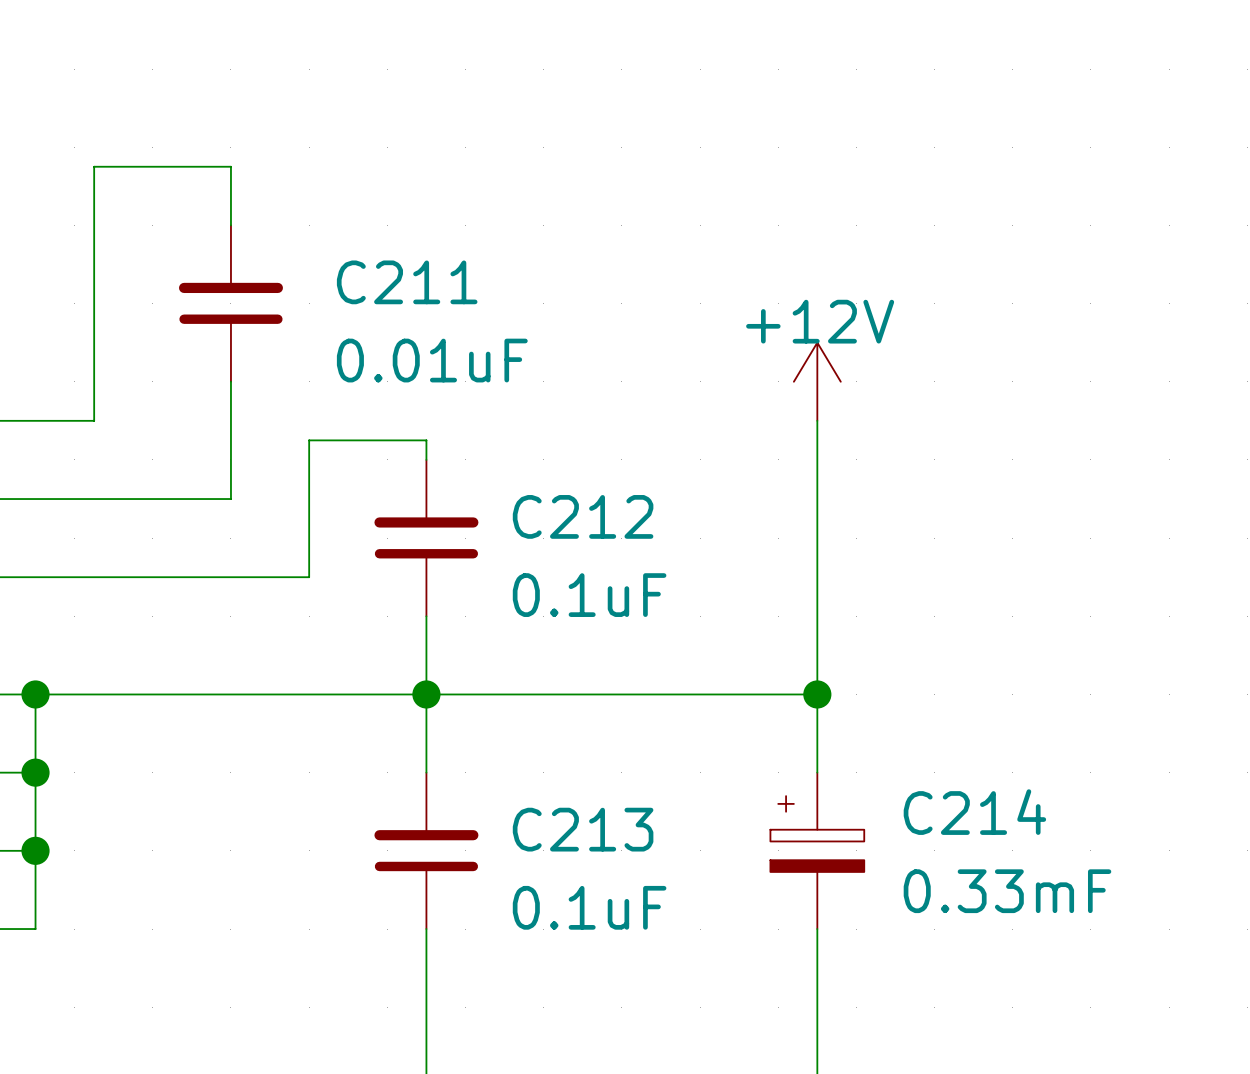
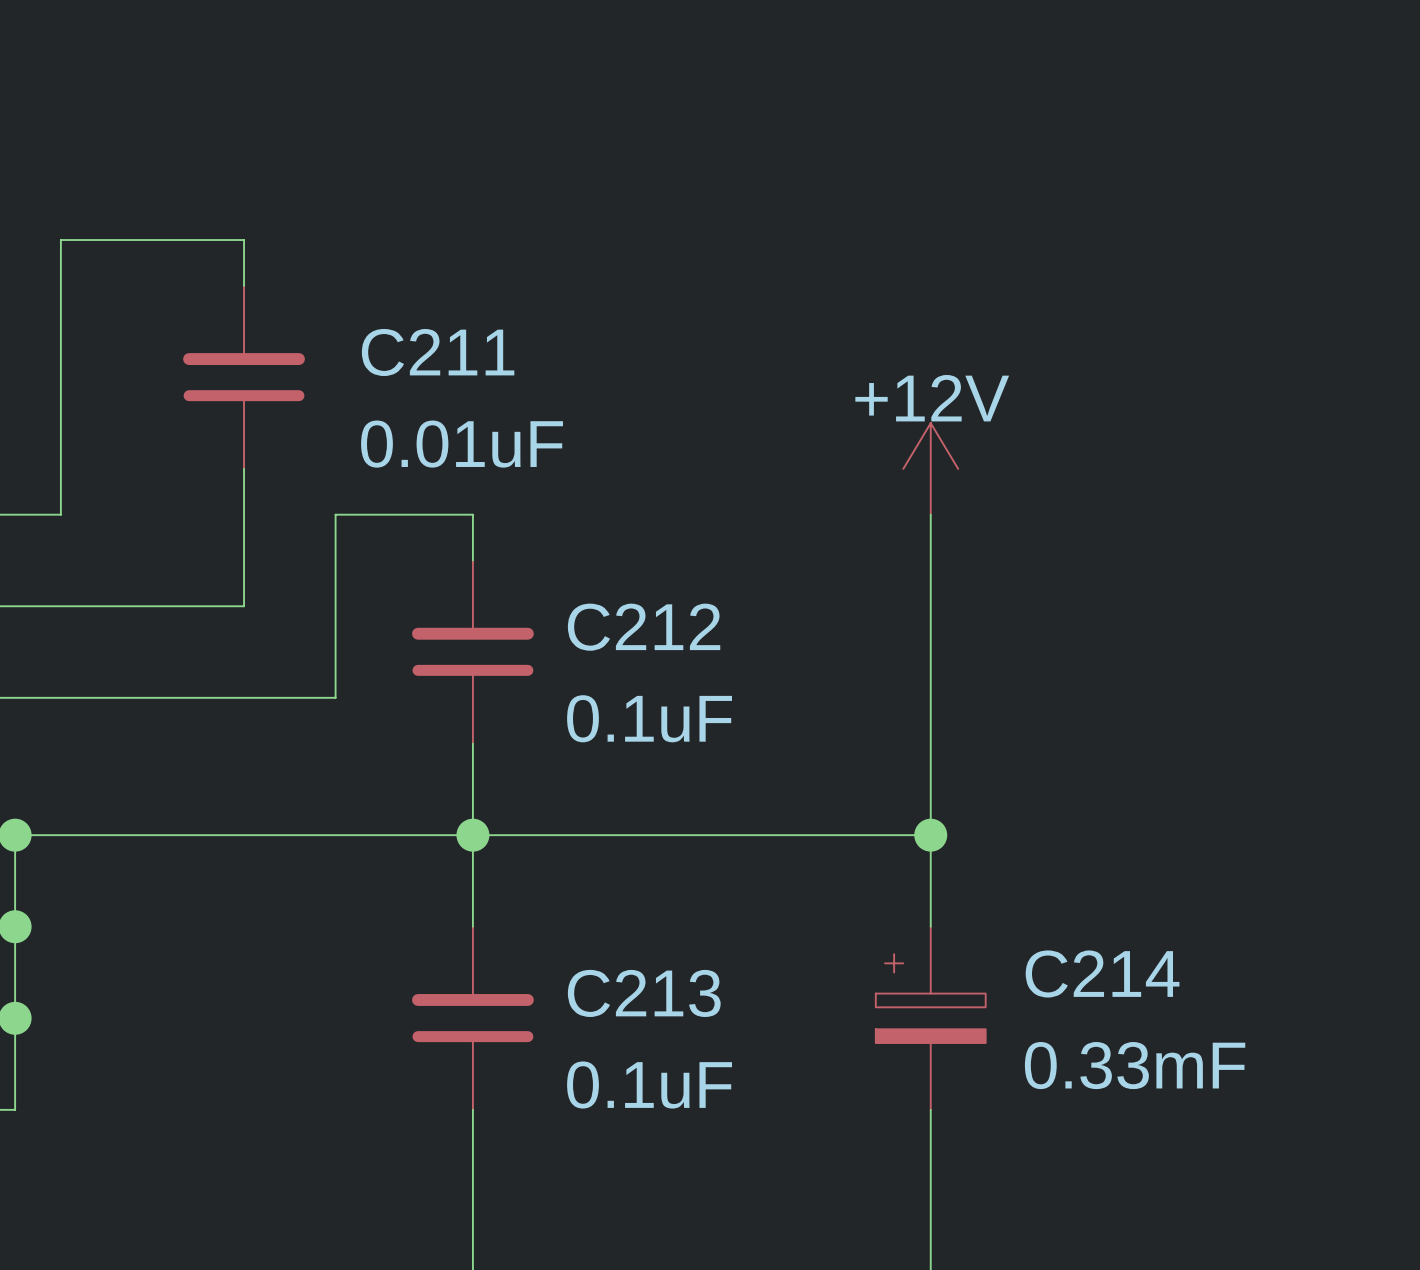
wire: (230, 186) (230, 166) (94, 166) (94, 420) (74, 420) -> (244, 240) (60, 240) (60, 514)
wire: (309, 440) (426, 440) -> (335, 537) (335, 514) (472, 514) (472, 537)

